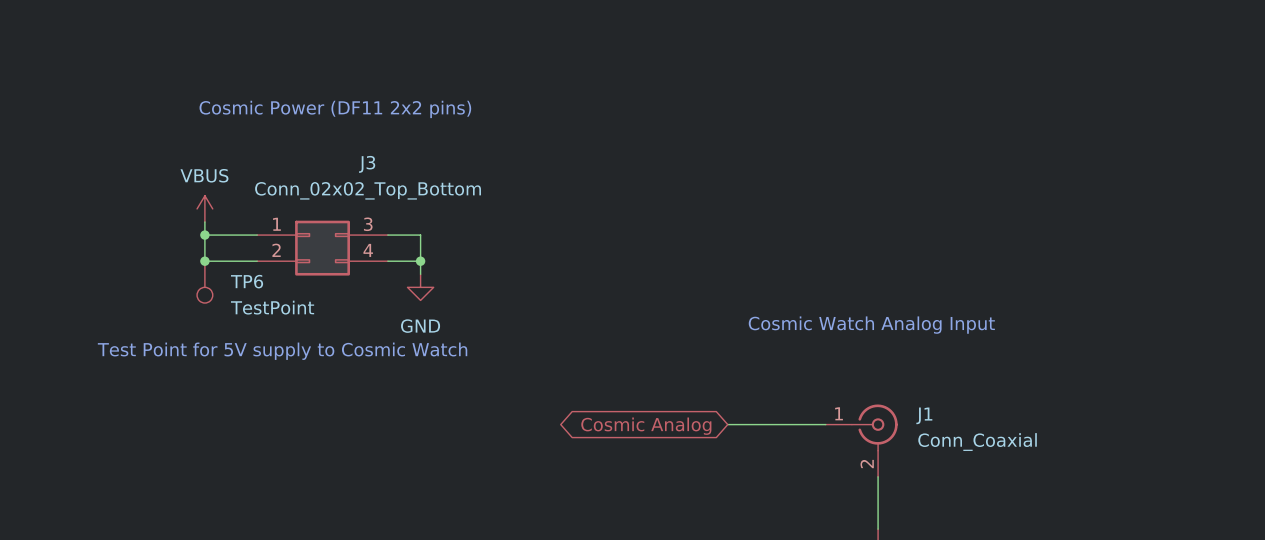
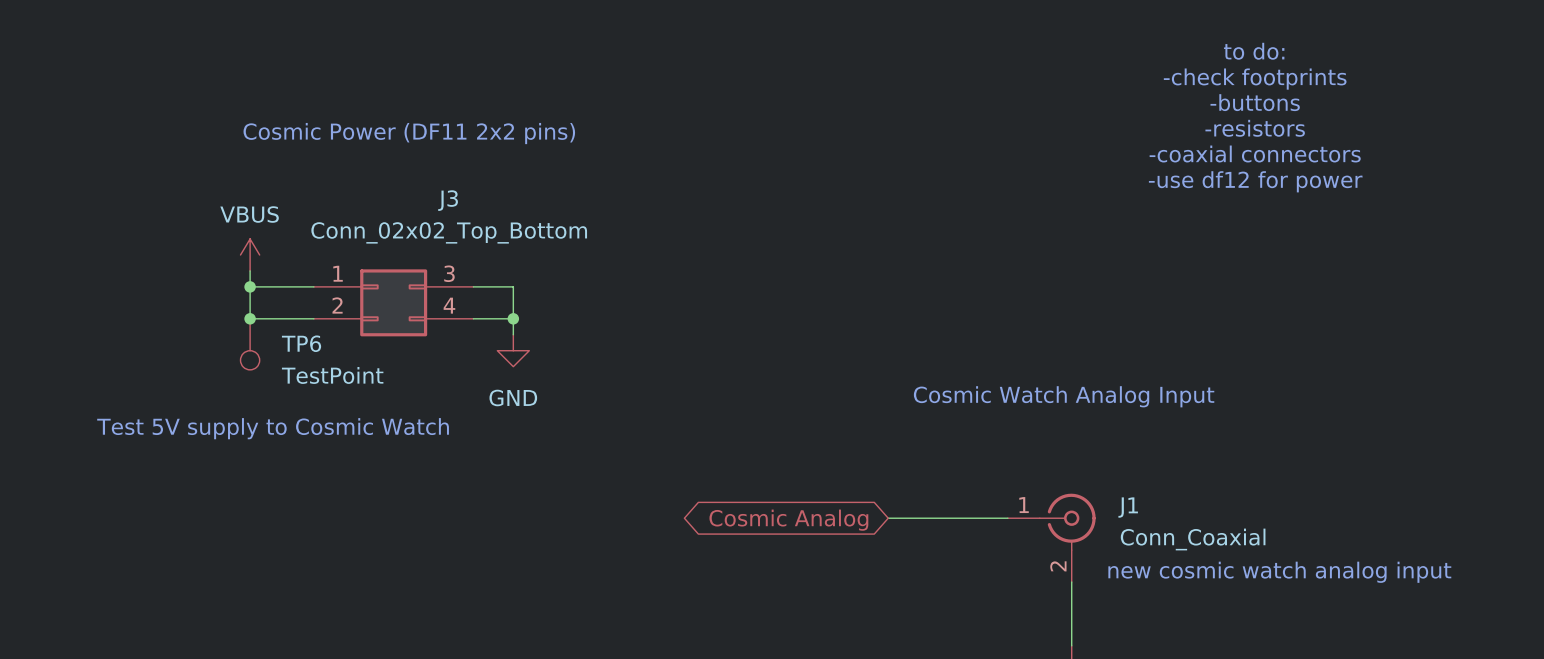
text: none -> to do: (1254, 51)
text: none -> -check footprints (1255, 79)
text: none -> -buttons (1255, 102)
text: none -> -resistors (1255, 128)
text: none -> -coaxial connectors (1255, 153)
text: none -> -use df12 for power (1255, 181)
text: Test Point for 5V supply to Cosmic Watch (282, 351) -> Test 5V supply to Cosmic Watch (273, 428)
text: none -> new cosmic watch analog input (1279, 572)

